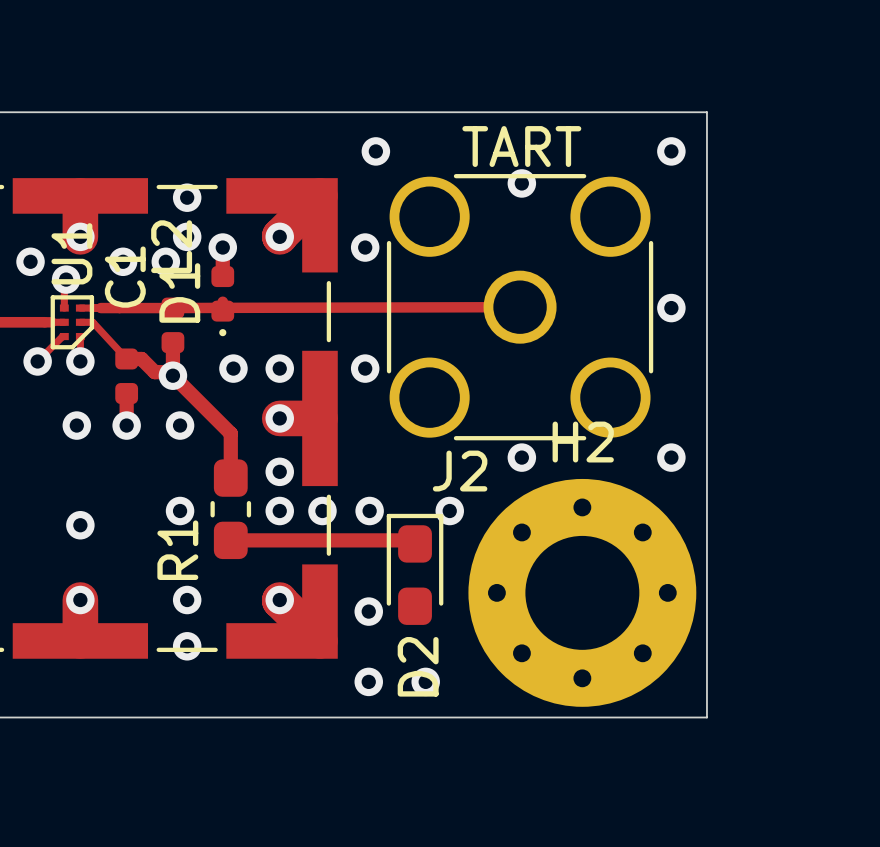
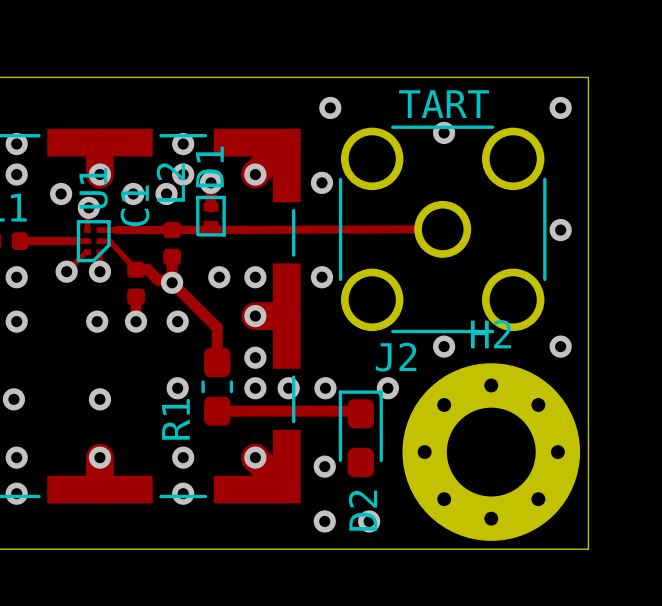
D1 footprint: [211, 266, 235, 337] -> [196, 195, 226, 237]

